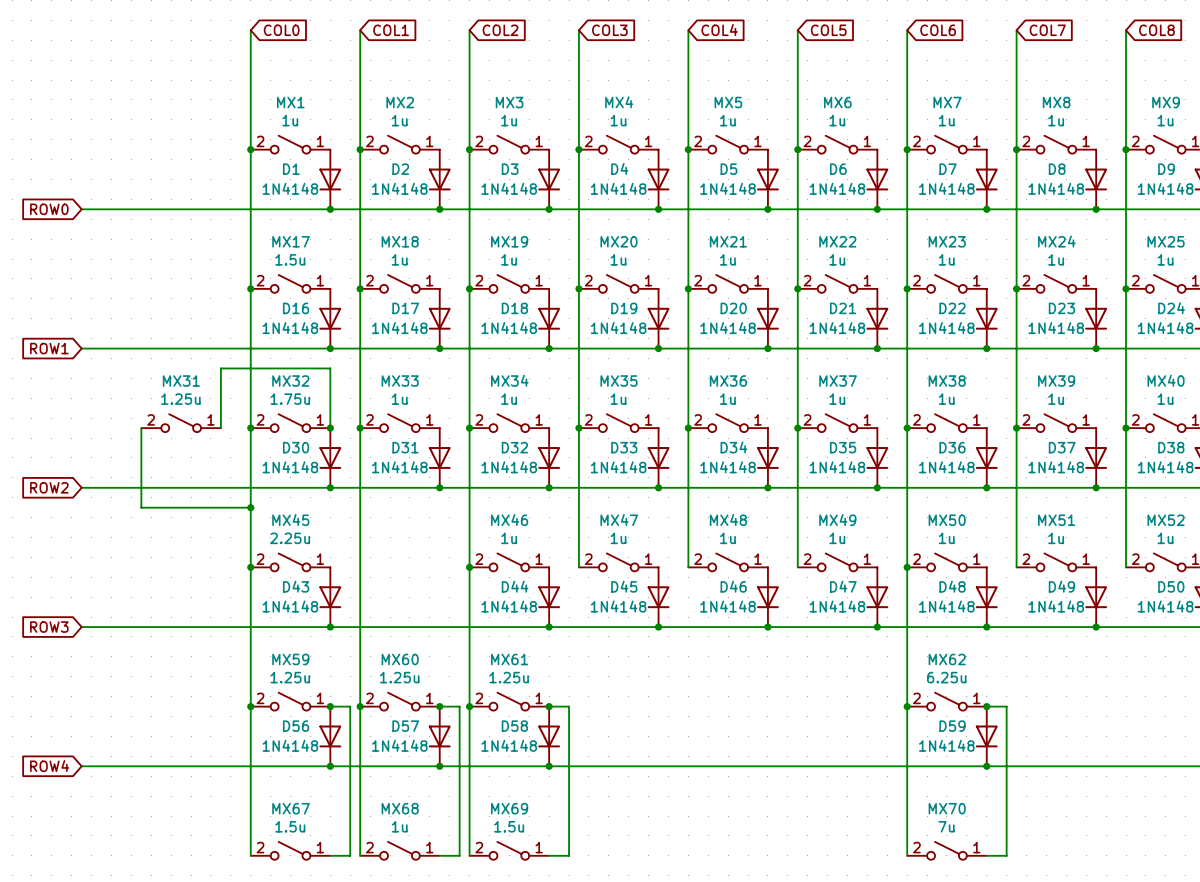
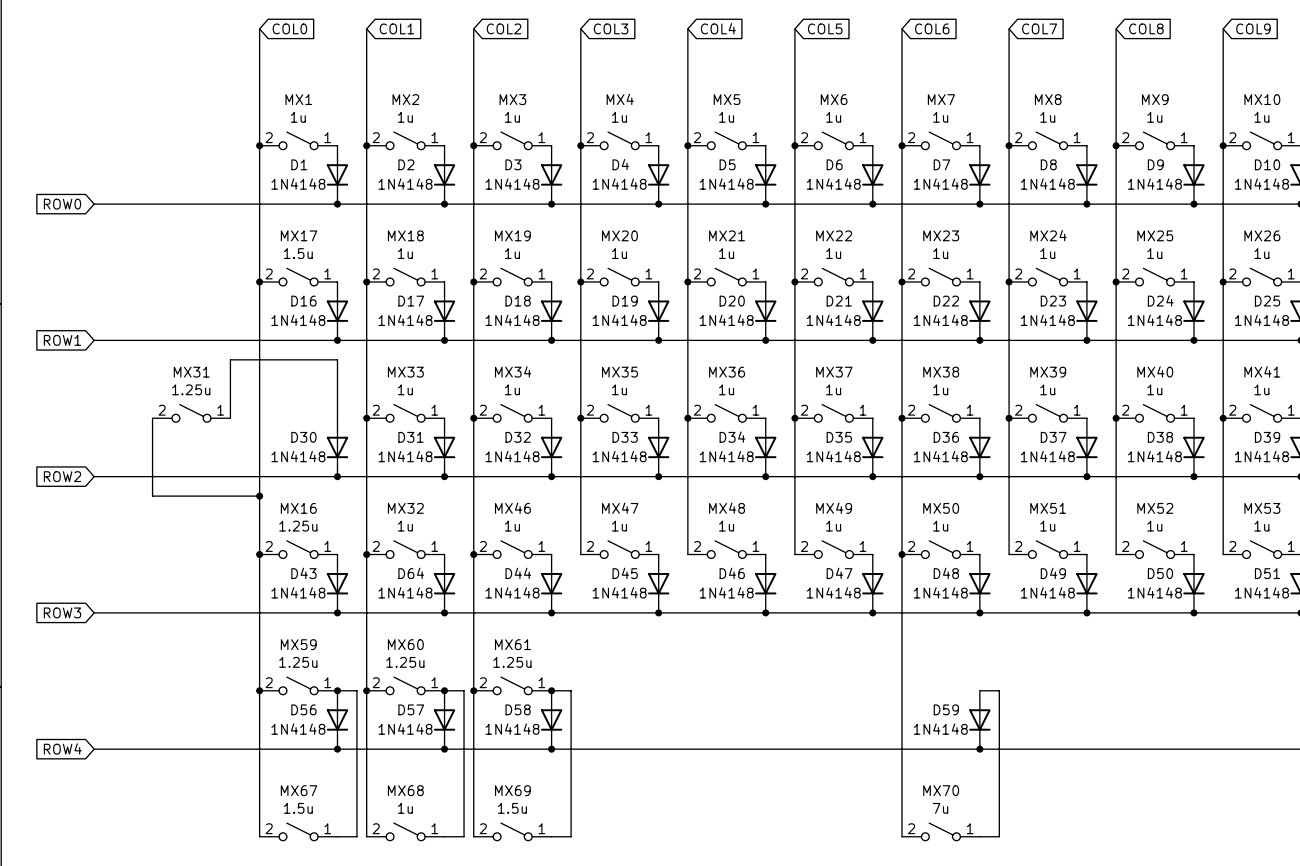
MX32 value: 1.75u (290, 399) -> 1u (405, 526)
MX32 position: (290, 423) -> (405, 549)
junction: (250, 428) -> none
junction: (330, 428) -> none
MX45 name: MX45 (290, 520) -> MX16 (298, 508)
MX45 value: 2.25u (290, 538) -> 1.25u (298, 526)
junction: none -> (366, 554)
D64: none -> 1N4148 (444, 583)
junction: none -> (444, 612)
MX62: 6.25u (946, 701) -> none
junction: (907, 706) -> none
junction: (986, 706) -> none

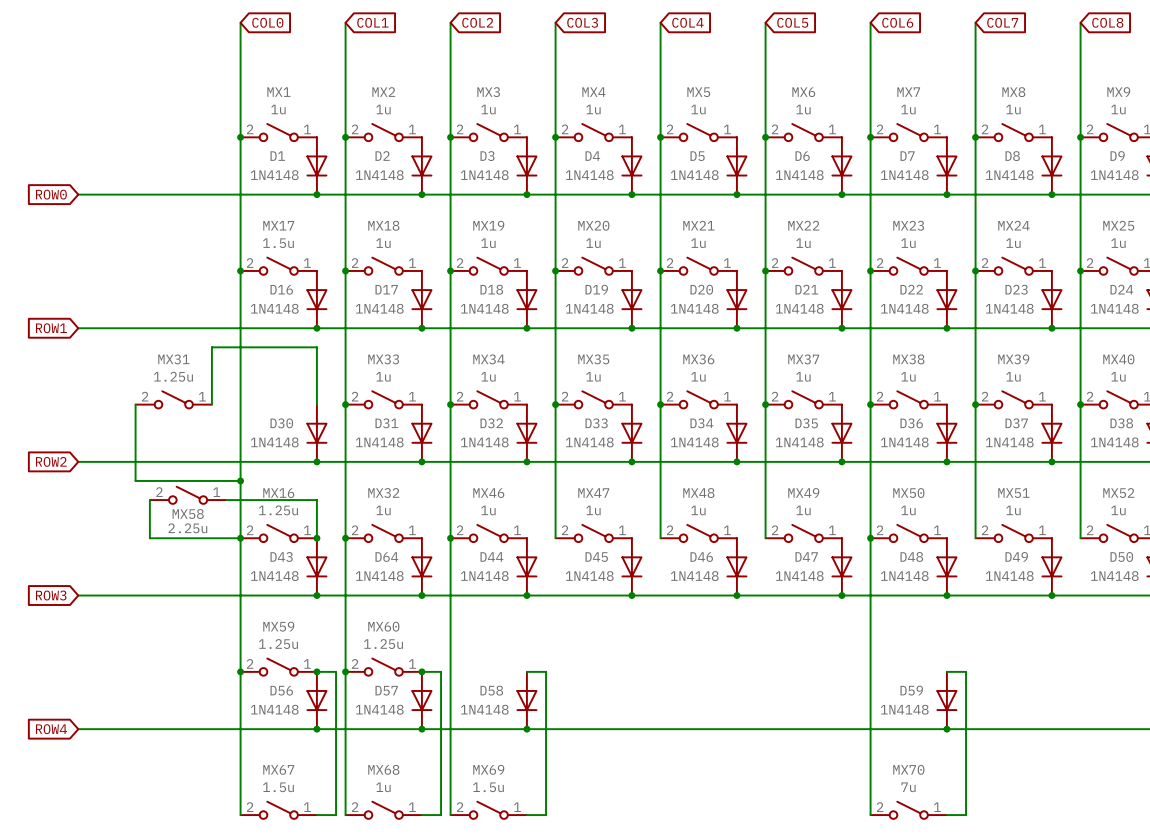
MX58: none -> 2.25u (188, 495)
wire: none -> (149, 500) (149, 538) (240, 538)
wire: none -> (226, 500) (316, 500) (316, 538)
junction: none -> (316, 538)
MX61: 1.25u (512, 685) -> none
junction: (473, 690) -> none
junction: (551, 690) -> none

